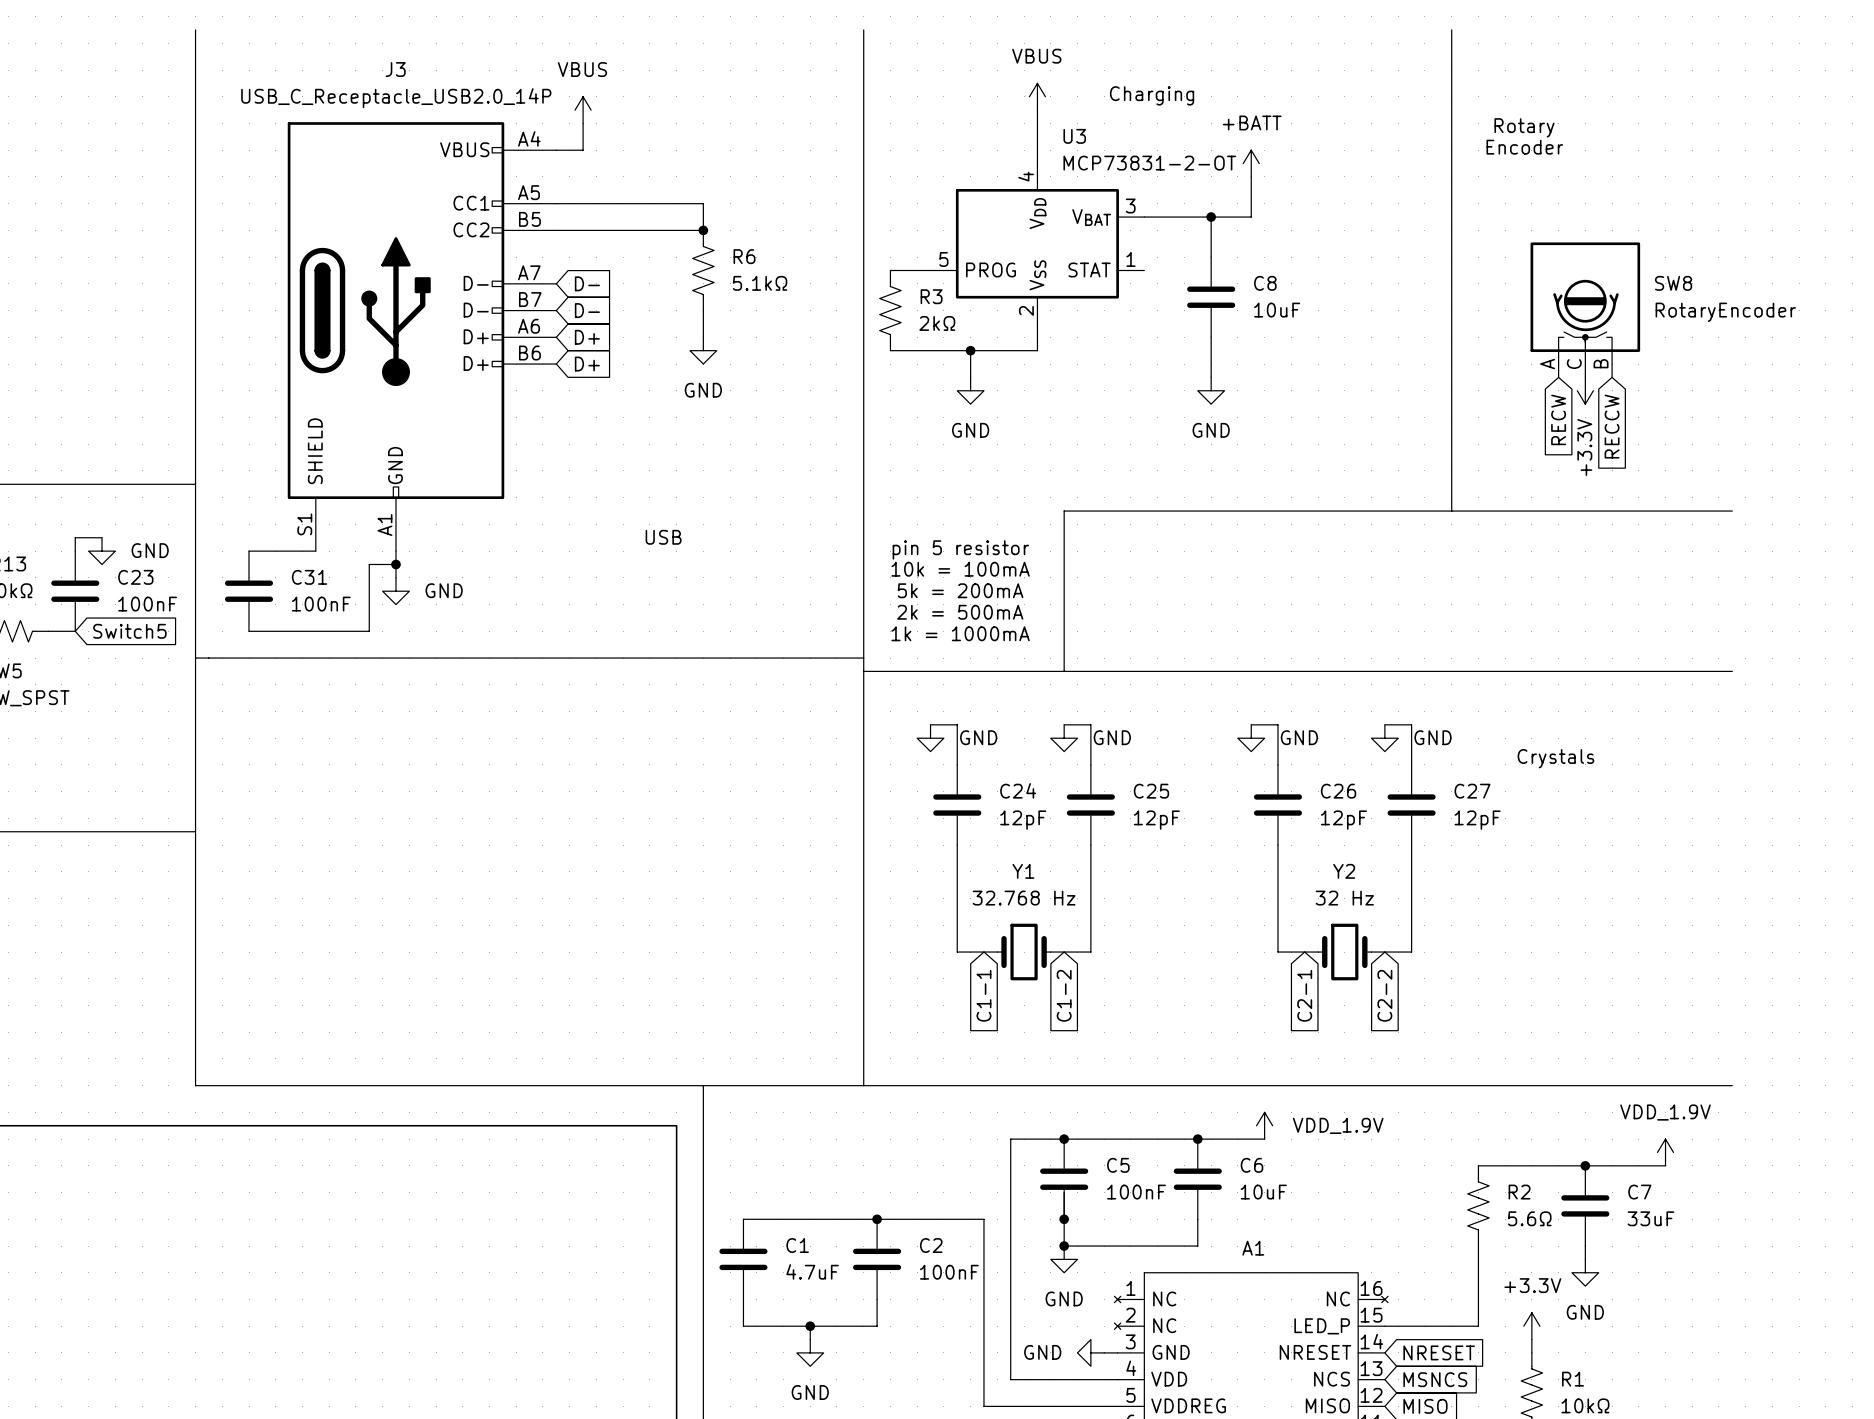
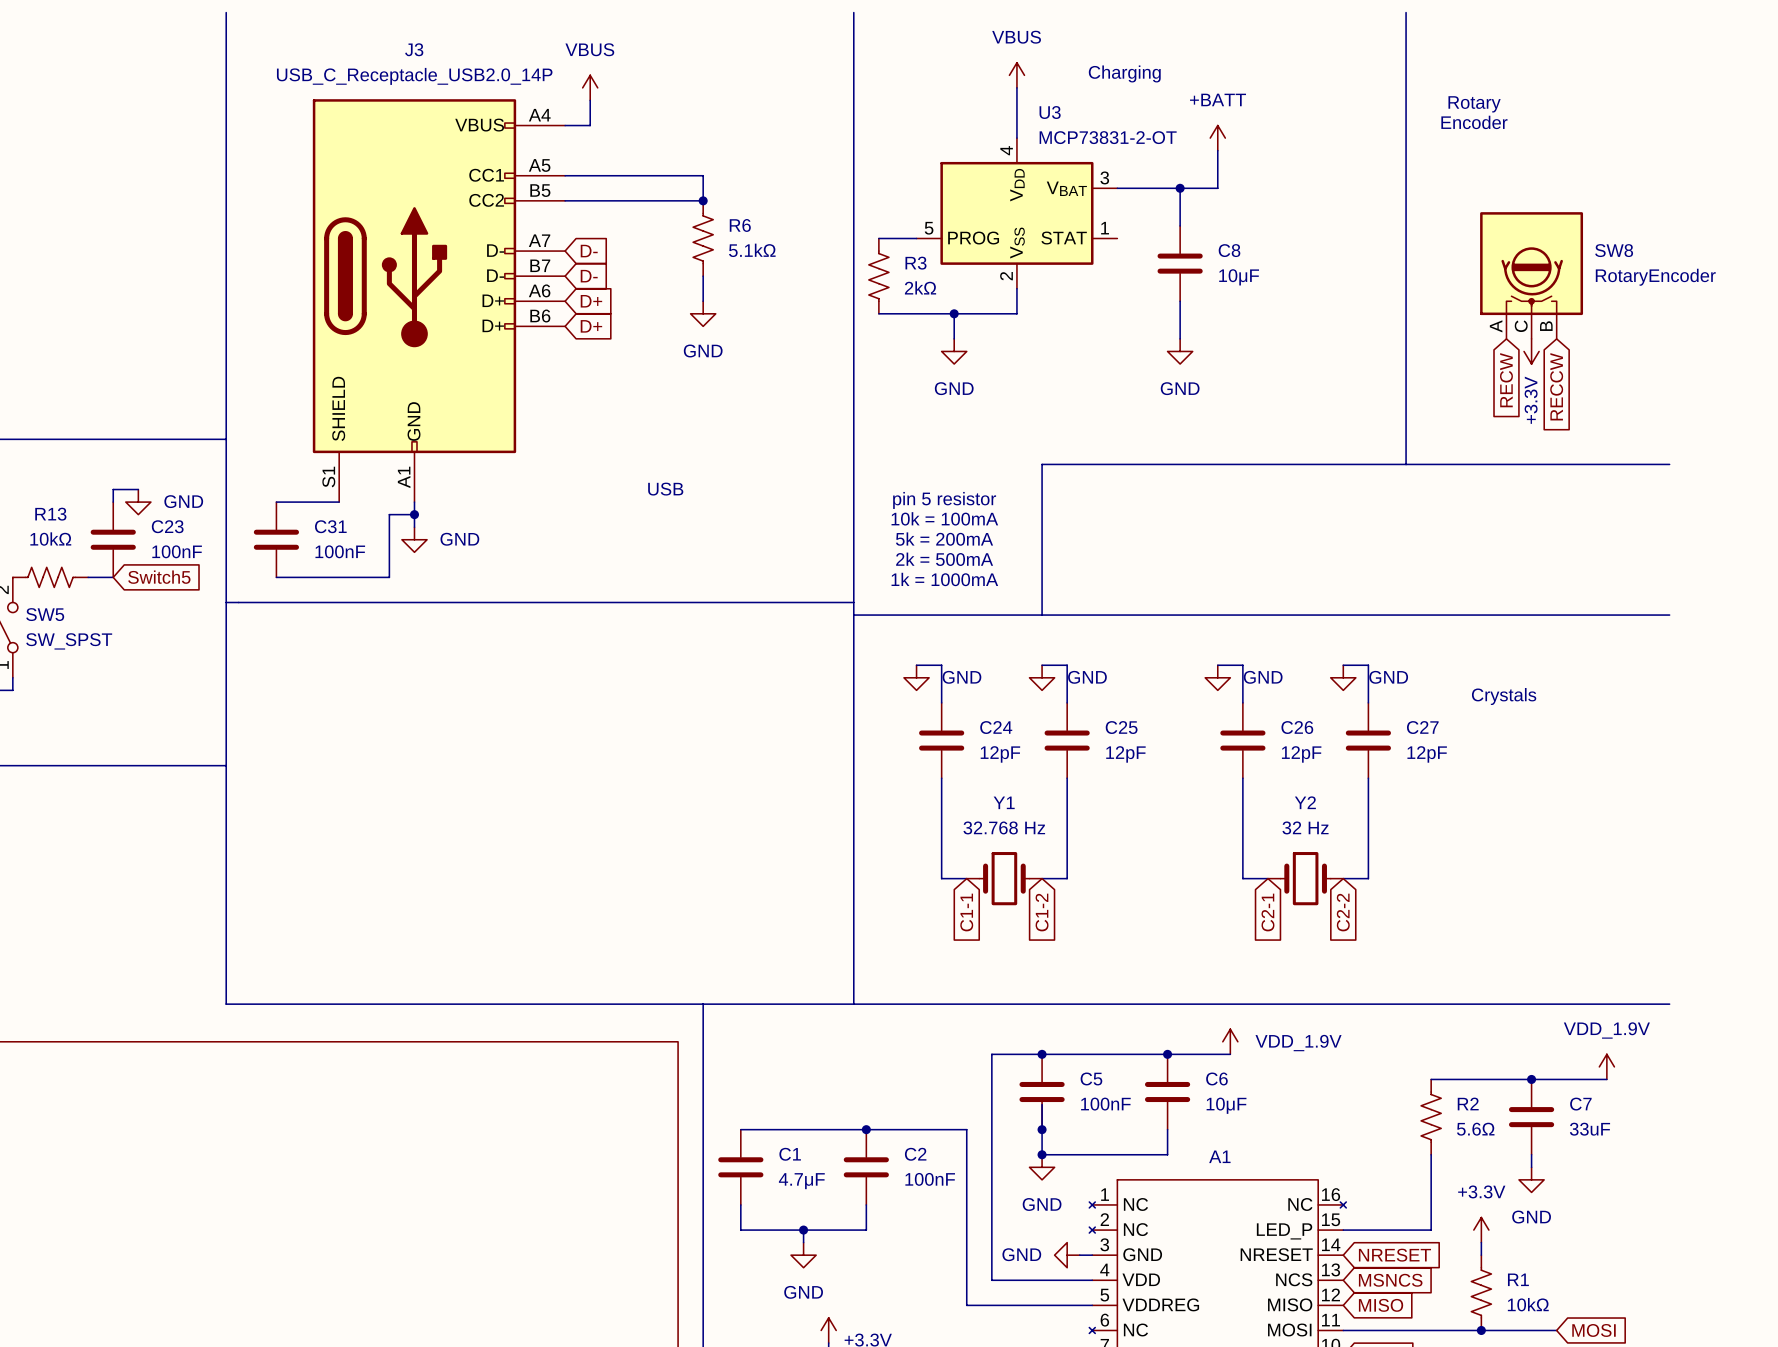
C8 value: 10uF (1277, 310) -> 10μF (1239, 277)
C6 value: 10uF (1263, 1192) -> 10μF (1226, 1105)
C1 value: 4.7uF (812, 1271) -> 4.7μF (801, 1181)

